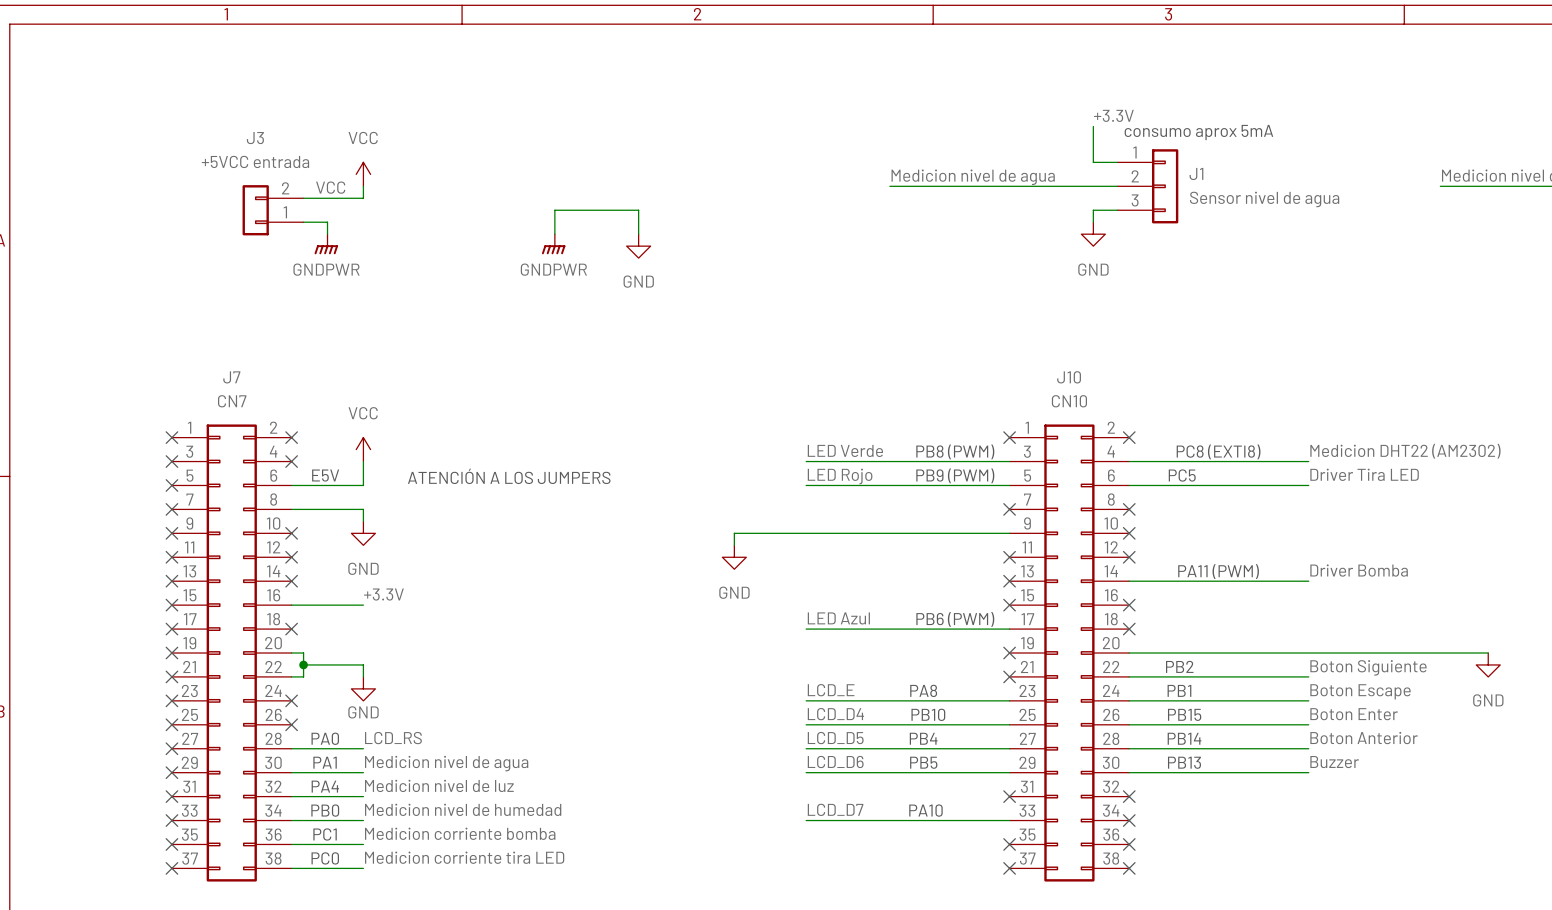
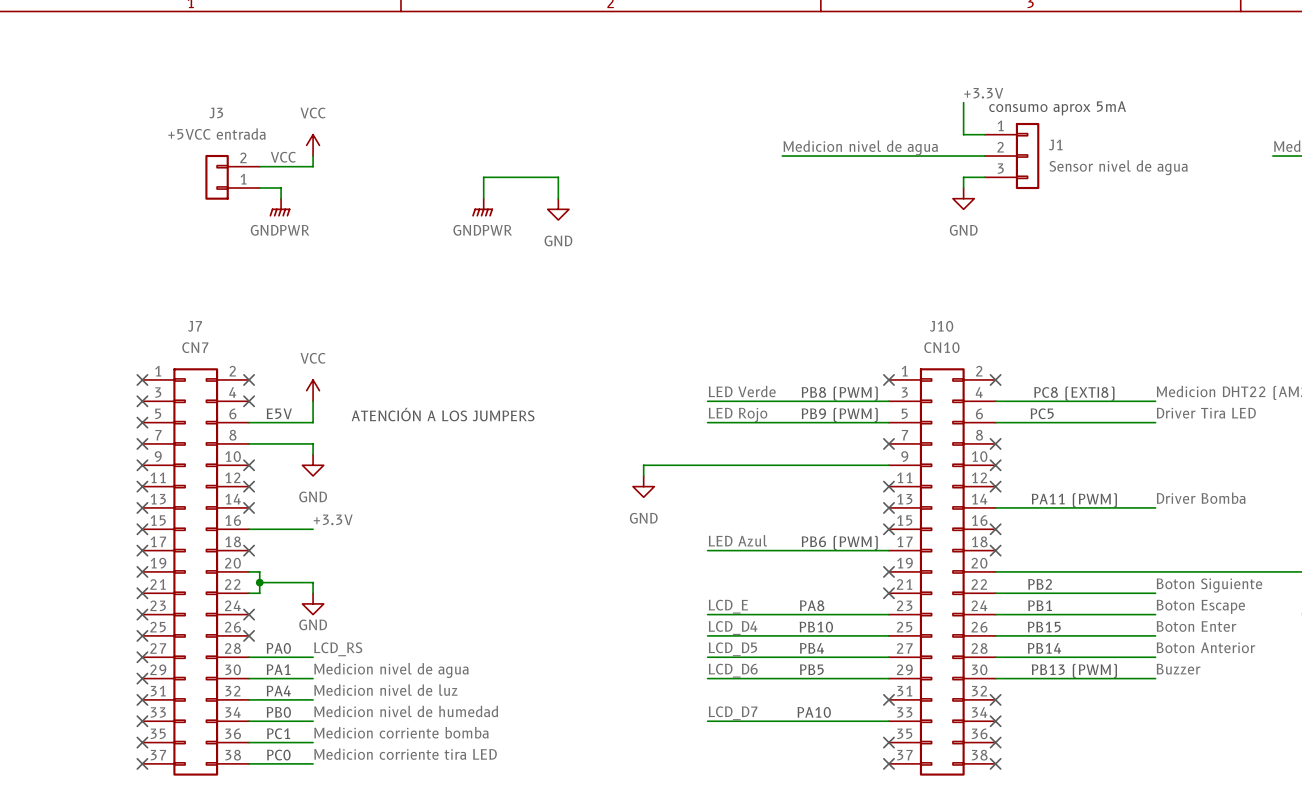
text: PB13 (1184, 762) -> none
text: none -> PB13 (PWM) (1074, 670)

